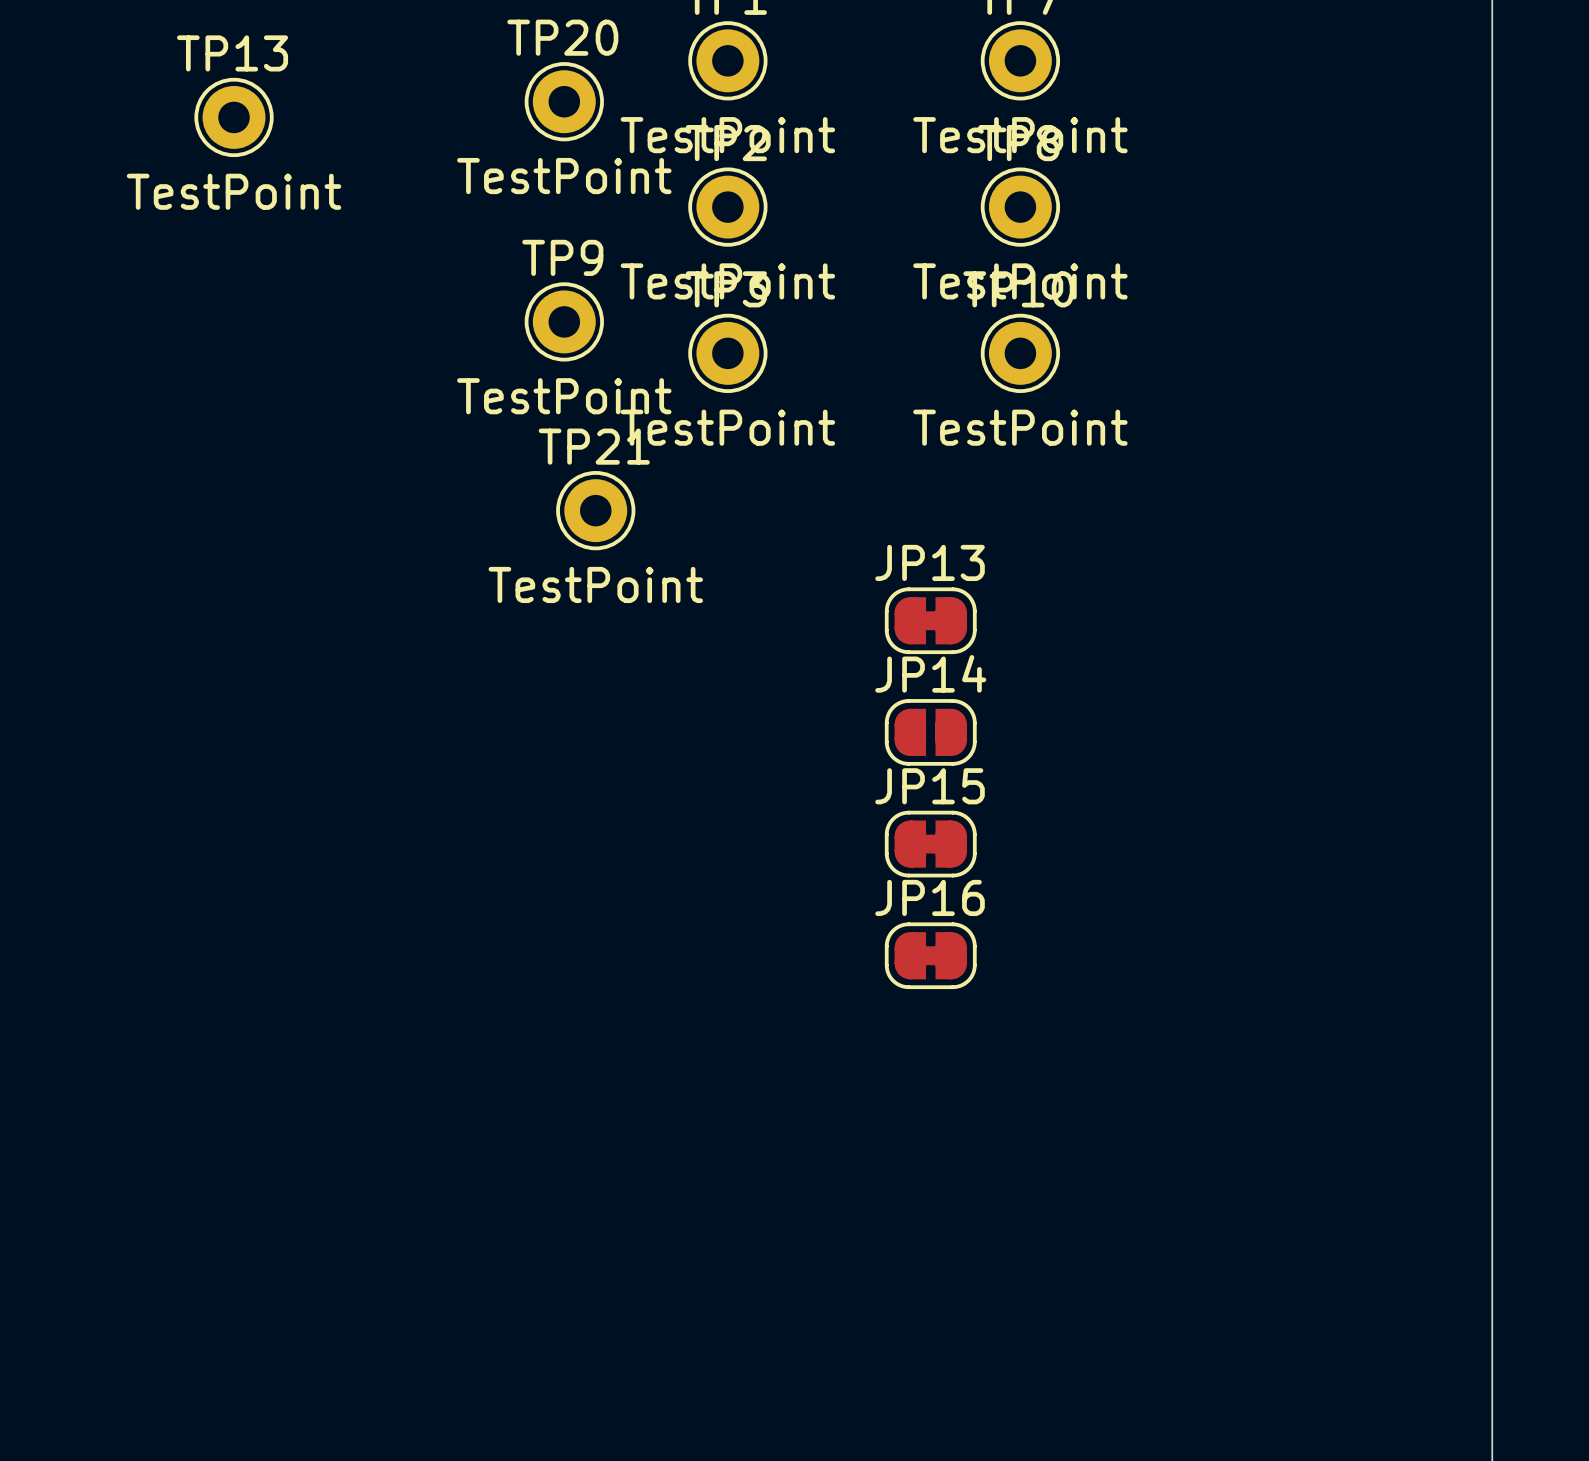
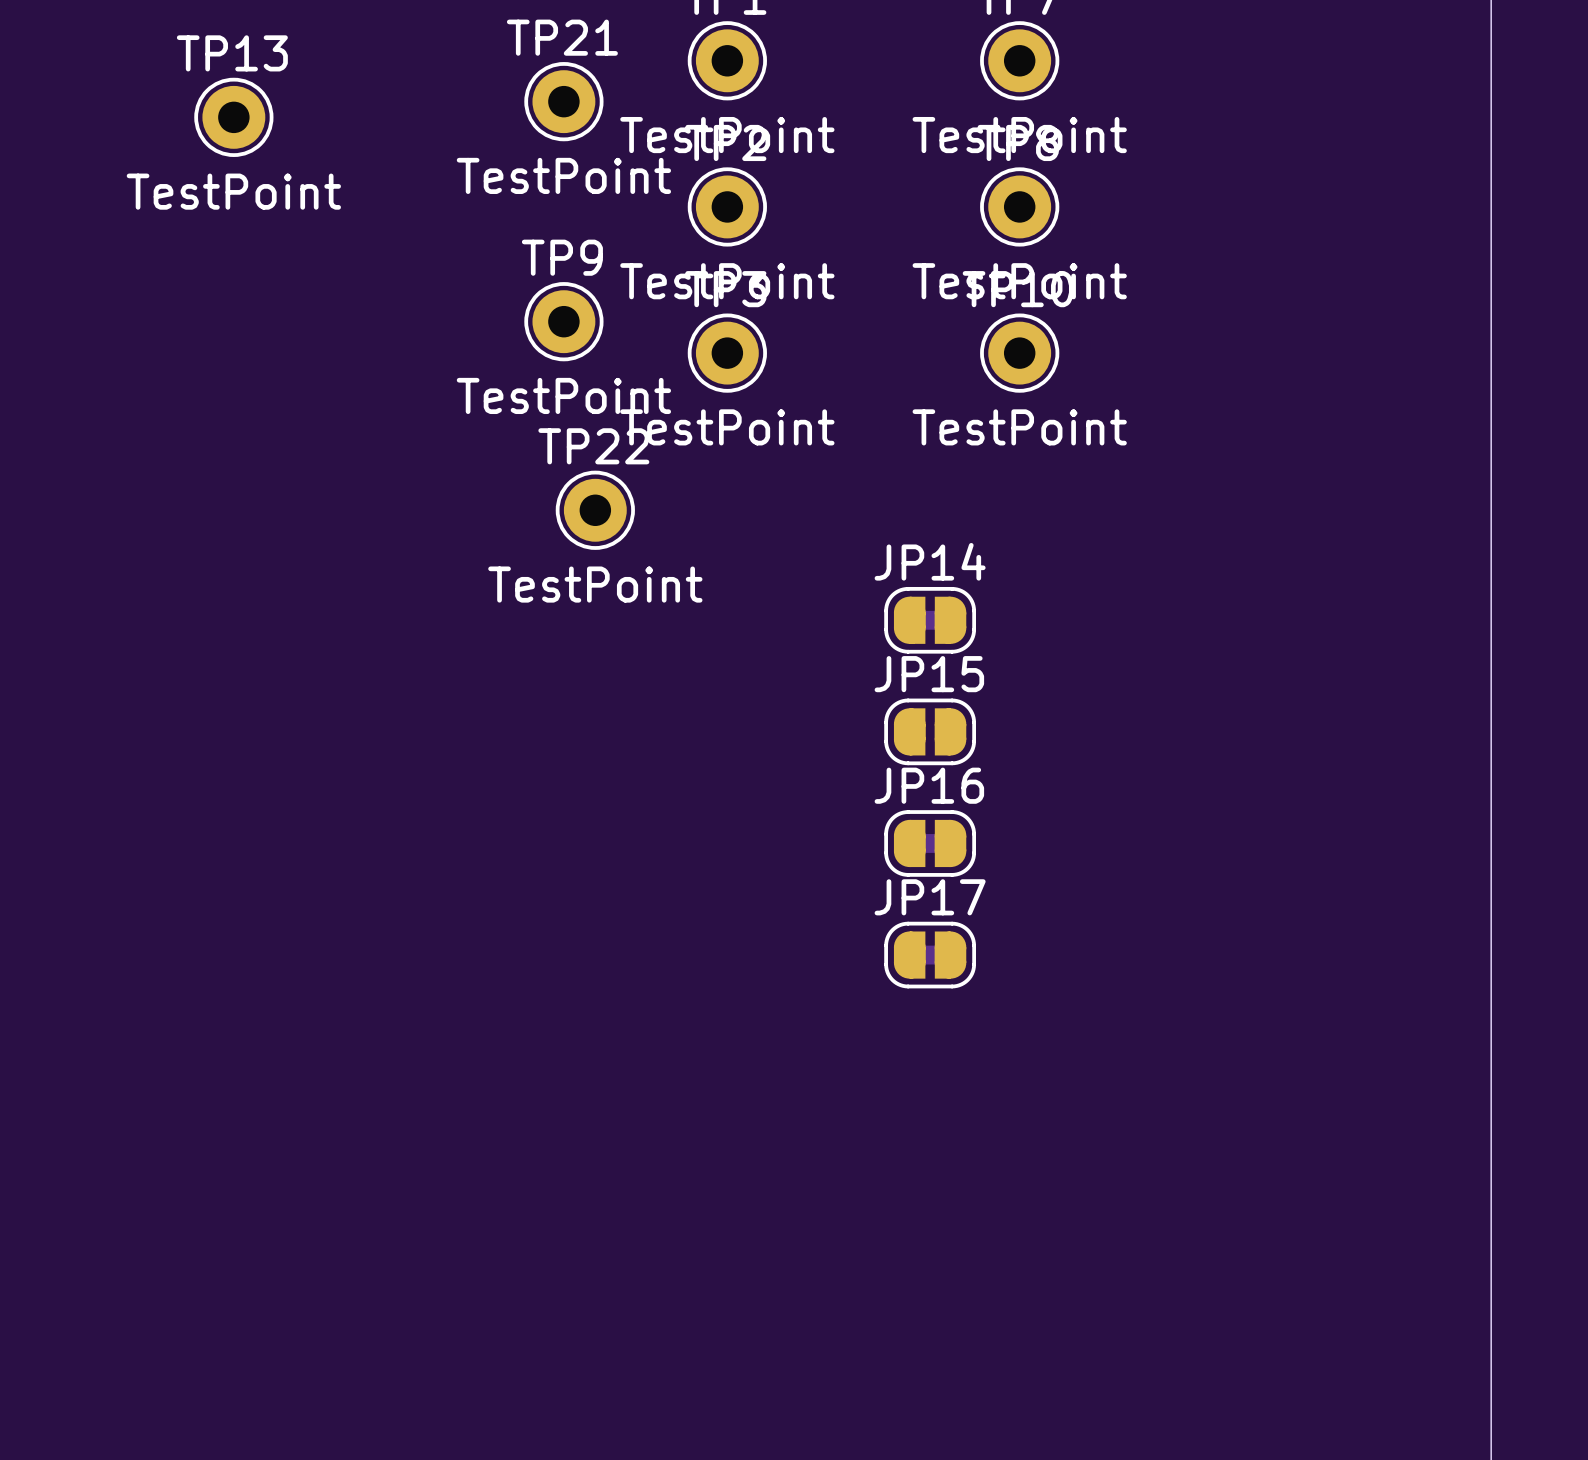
TP20 name: TP20 (562, 37) -> TP21 (562, 37)
TP21 name: TP21 (594, 446) -> TP22 (593, 446)
JP13 name: JP13 (930, 562) -> JP14 (930, 561)
JP14 name: JP14 (930, 673) -> JP15 (929, 674)
JP15 name: JP15 (930, 786) -> JP16 (929, 785)
JP16 name: JP16 (930, 897) -> JP17 (930, 897)

